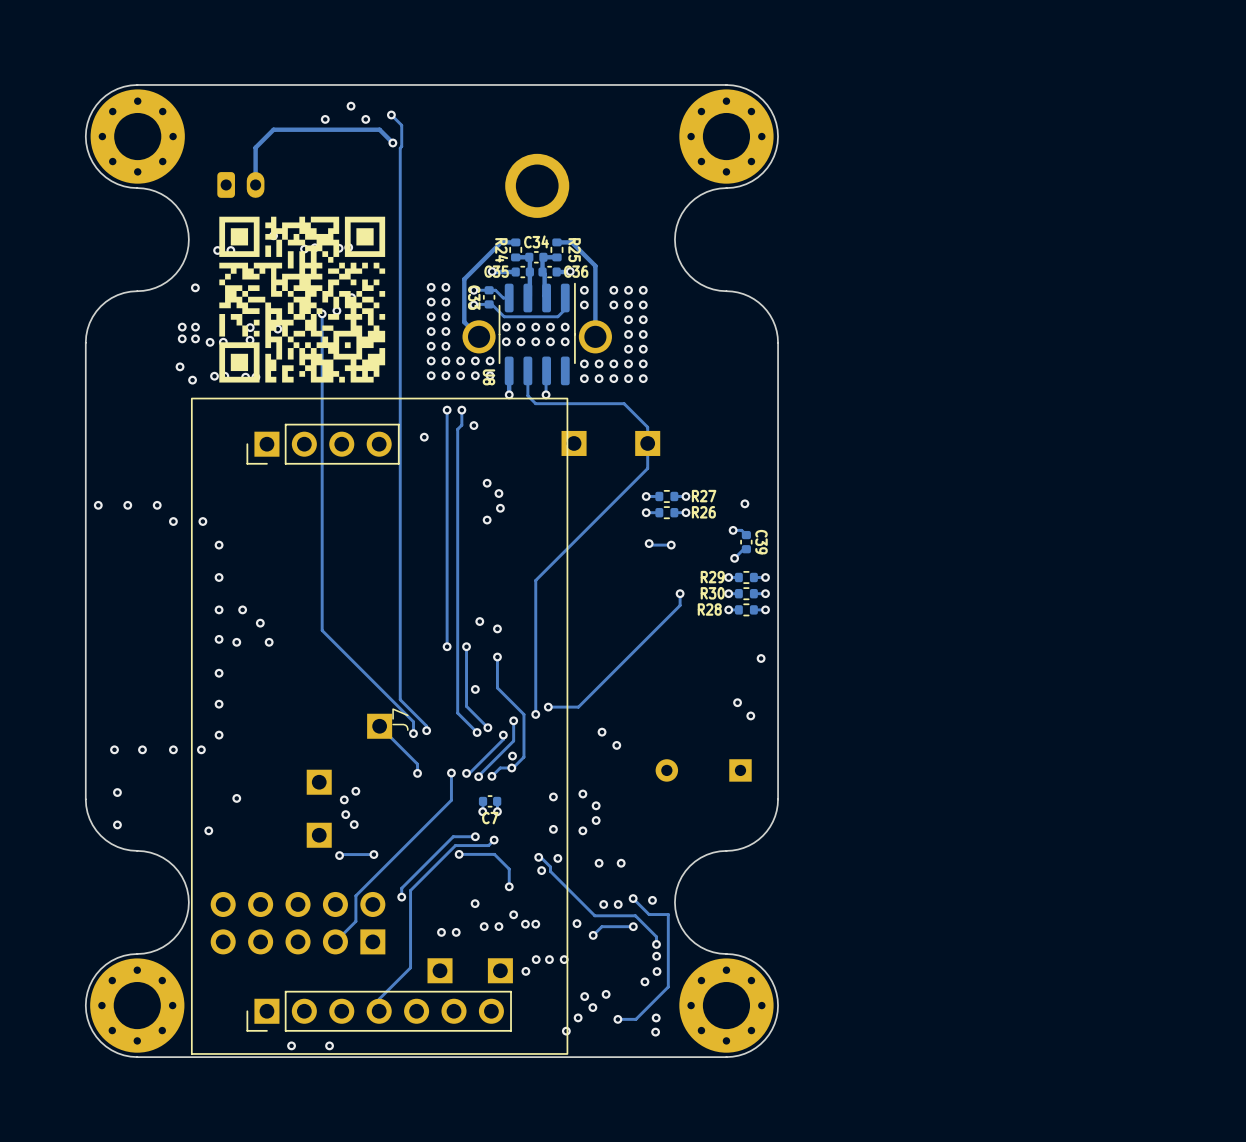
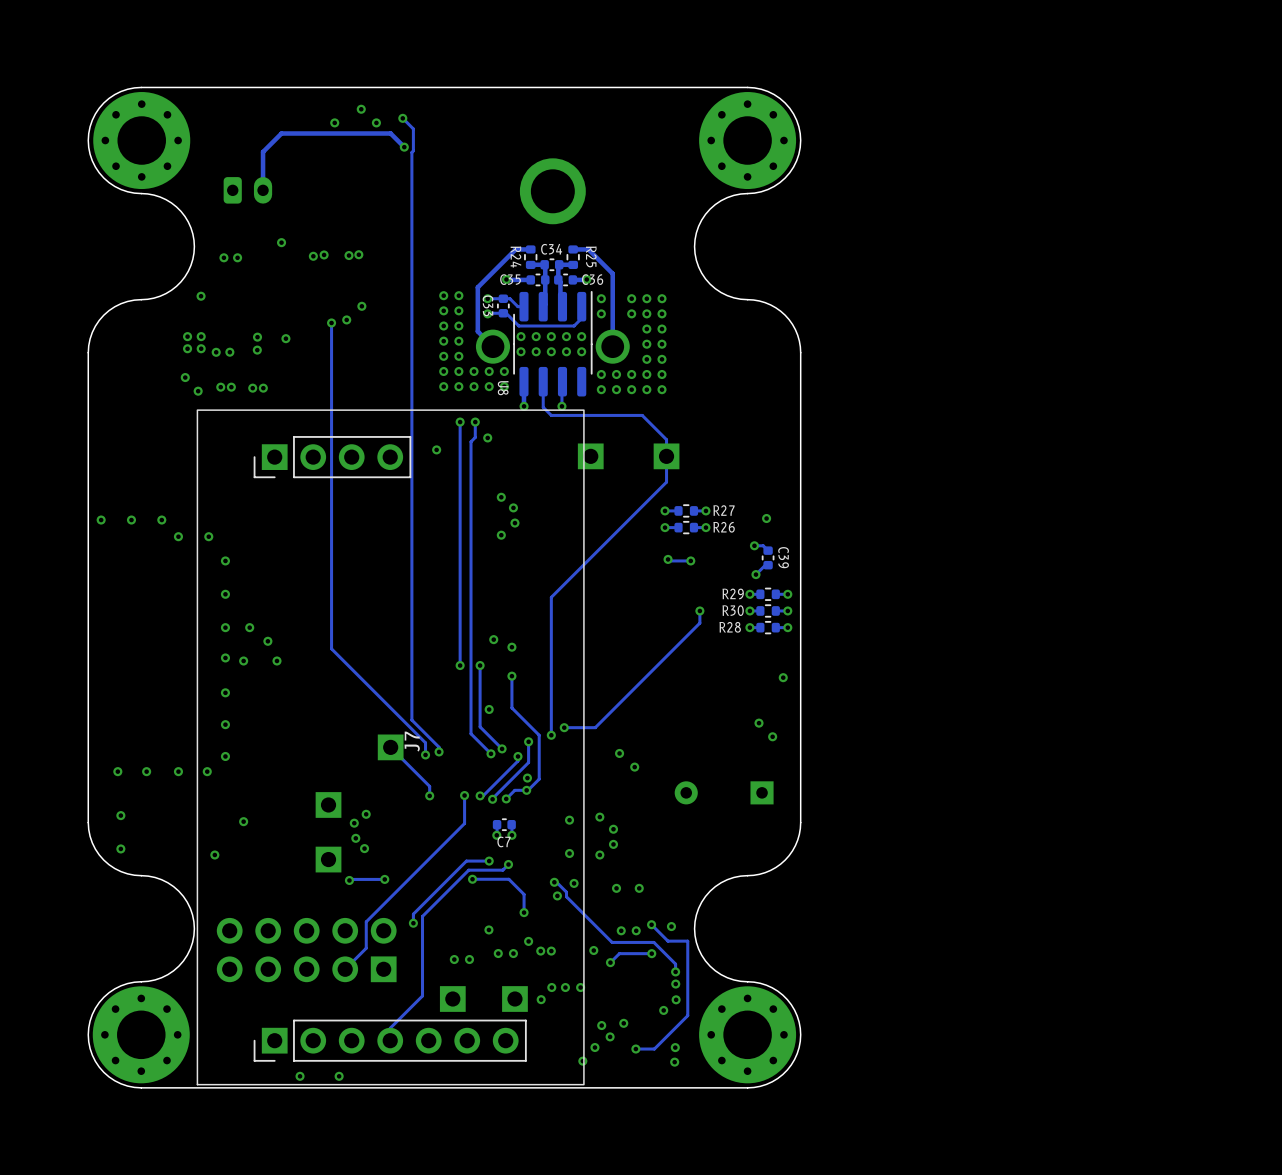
drawing: [219, 216, 386, 383] -> none

